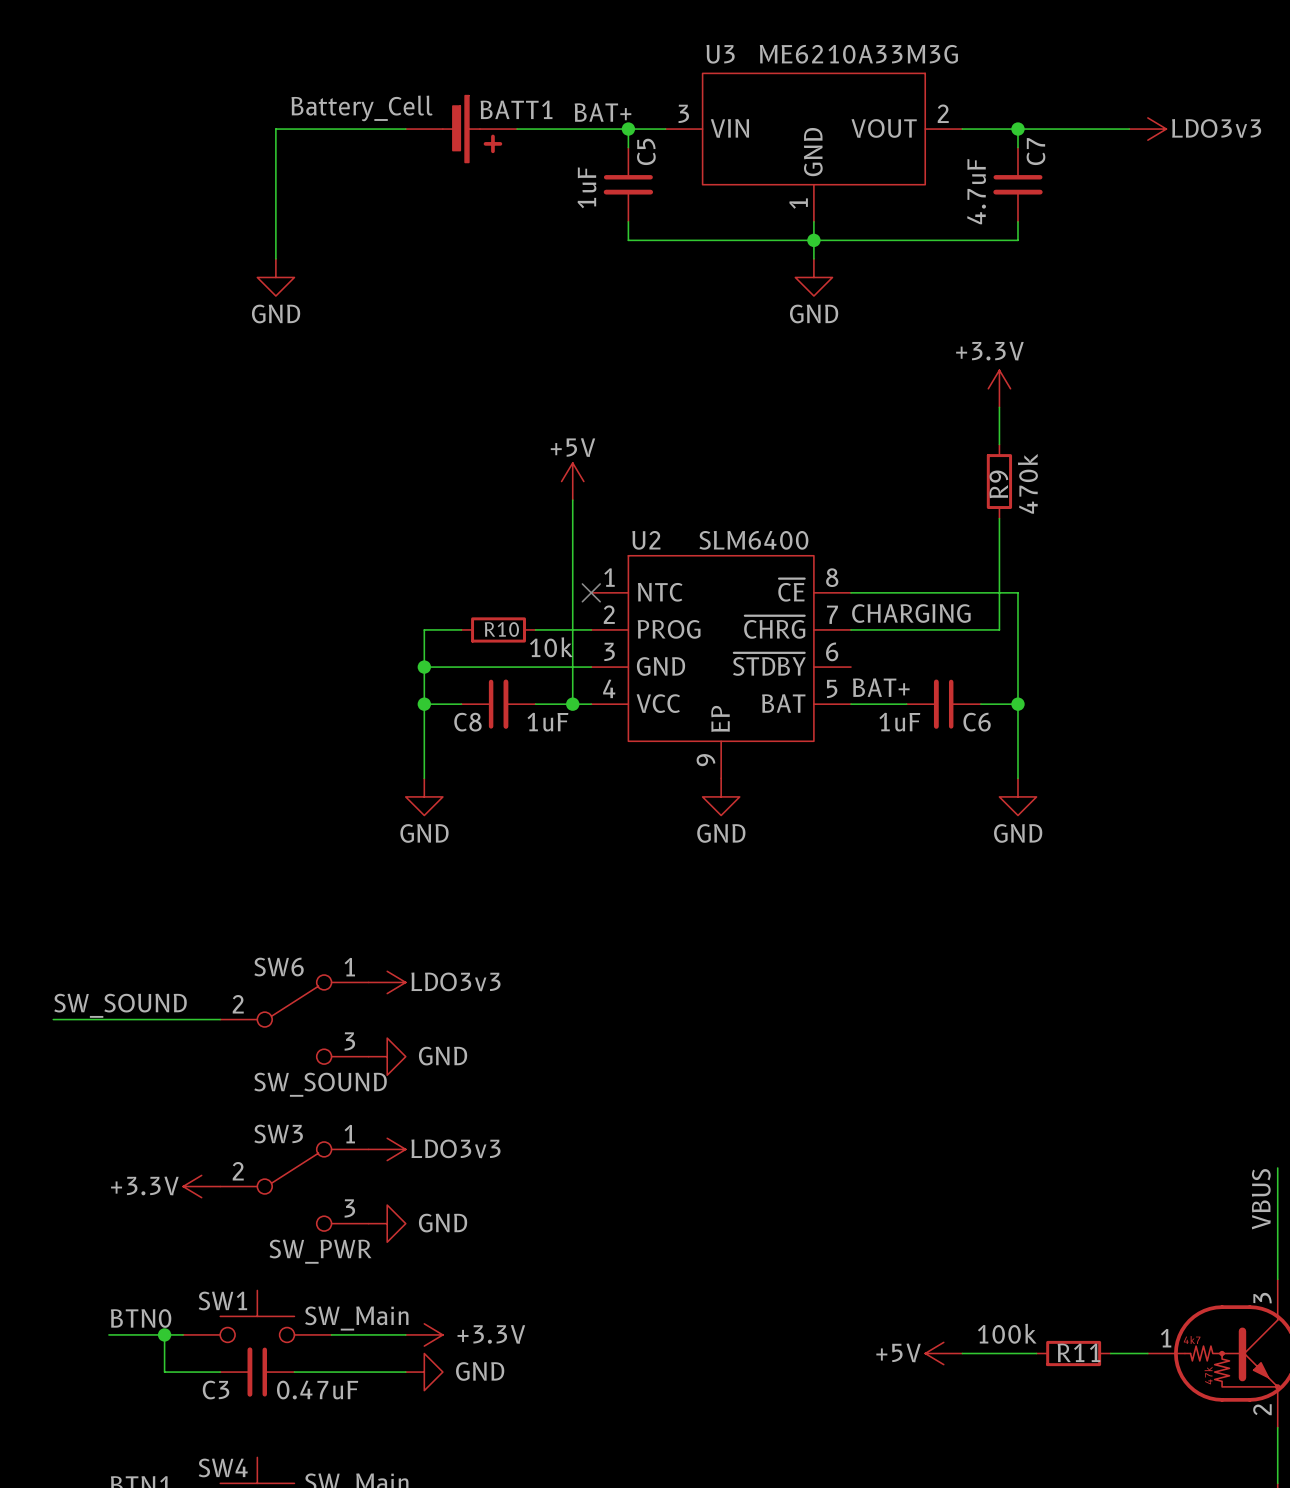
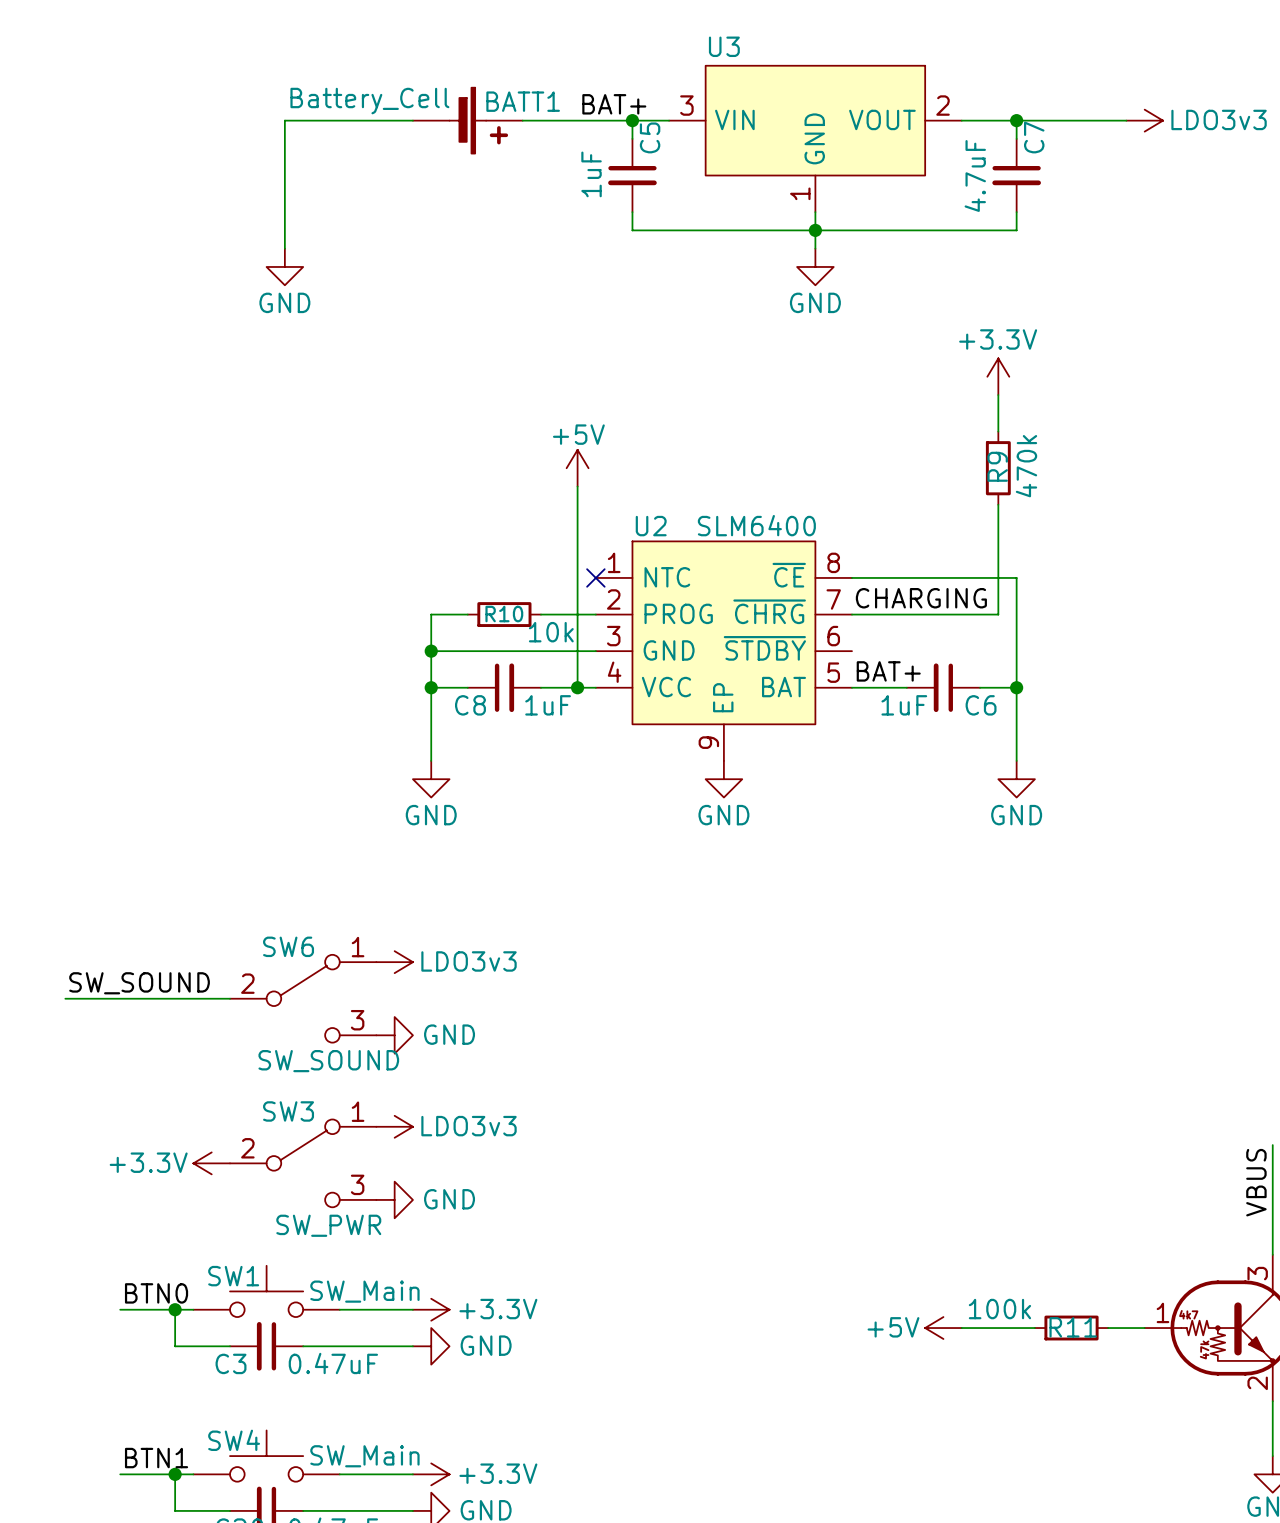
U3 value: ME6210A33M3G (858, 54) -> none

